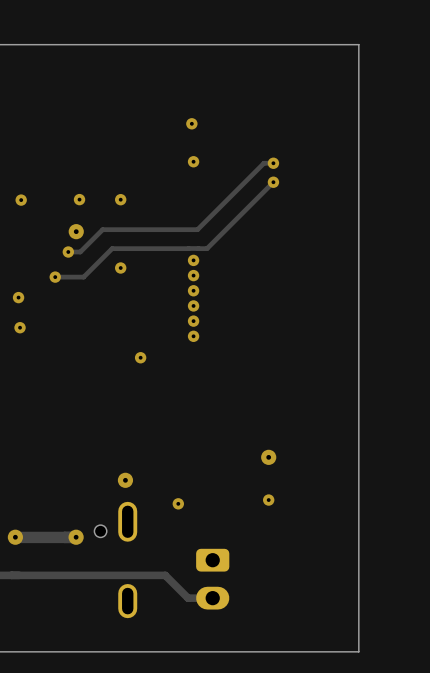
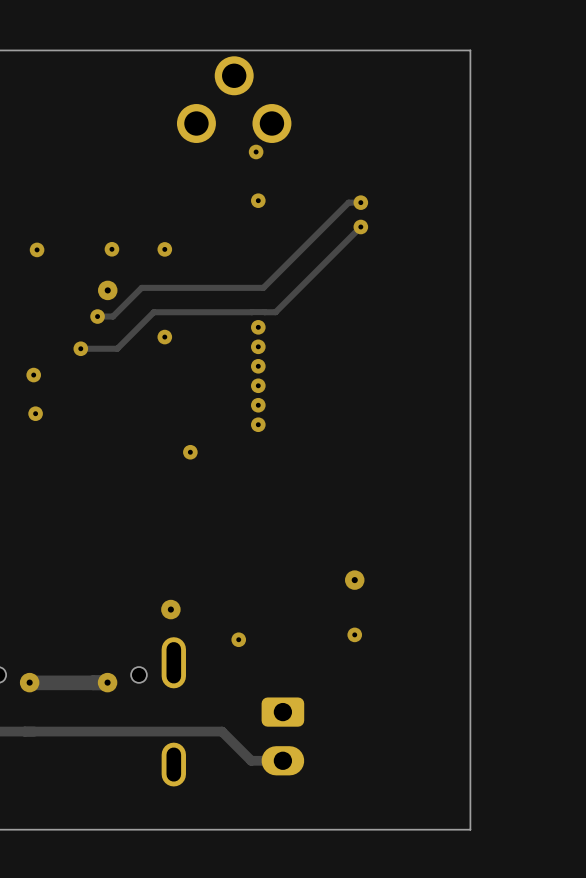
part: none -> (234, 99)

